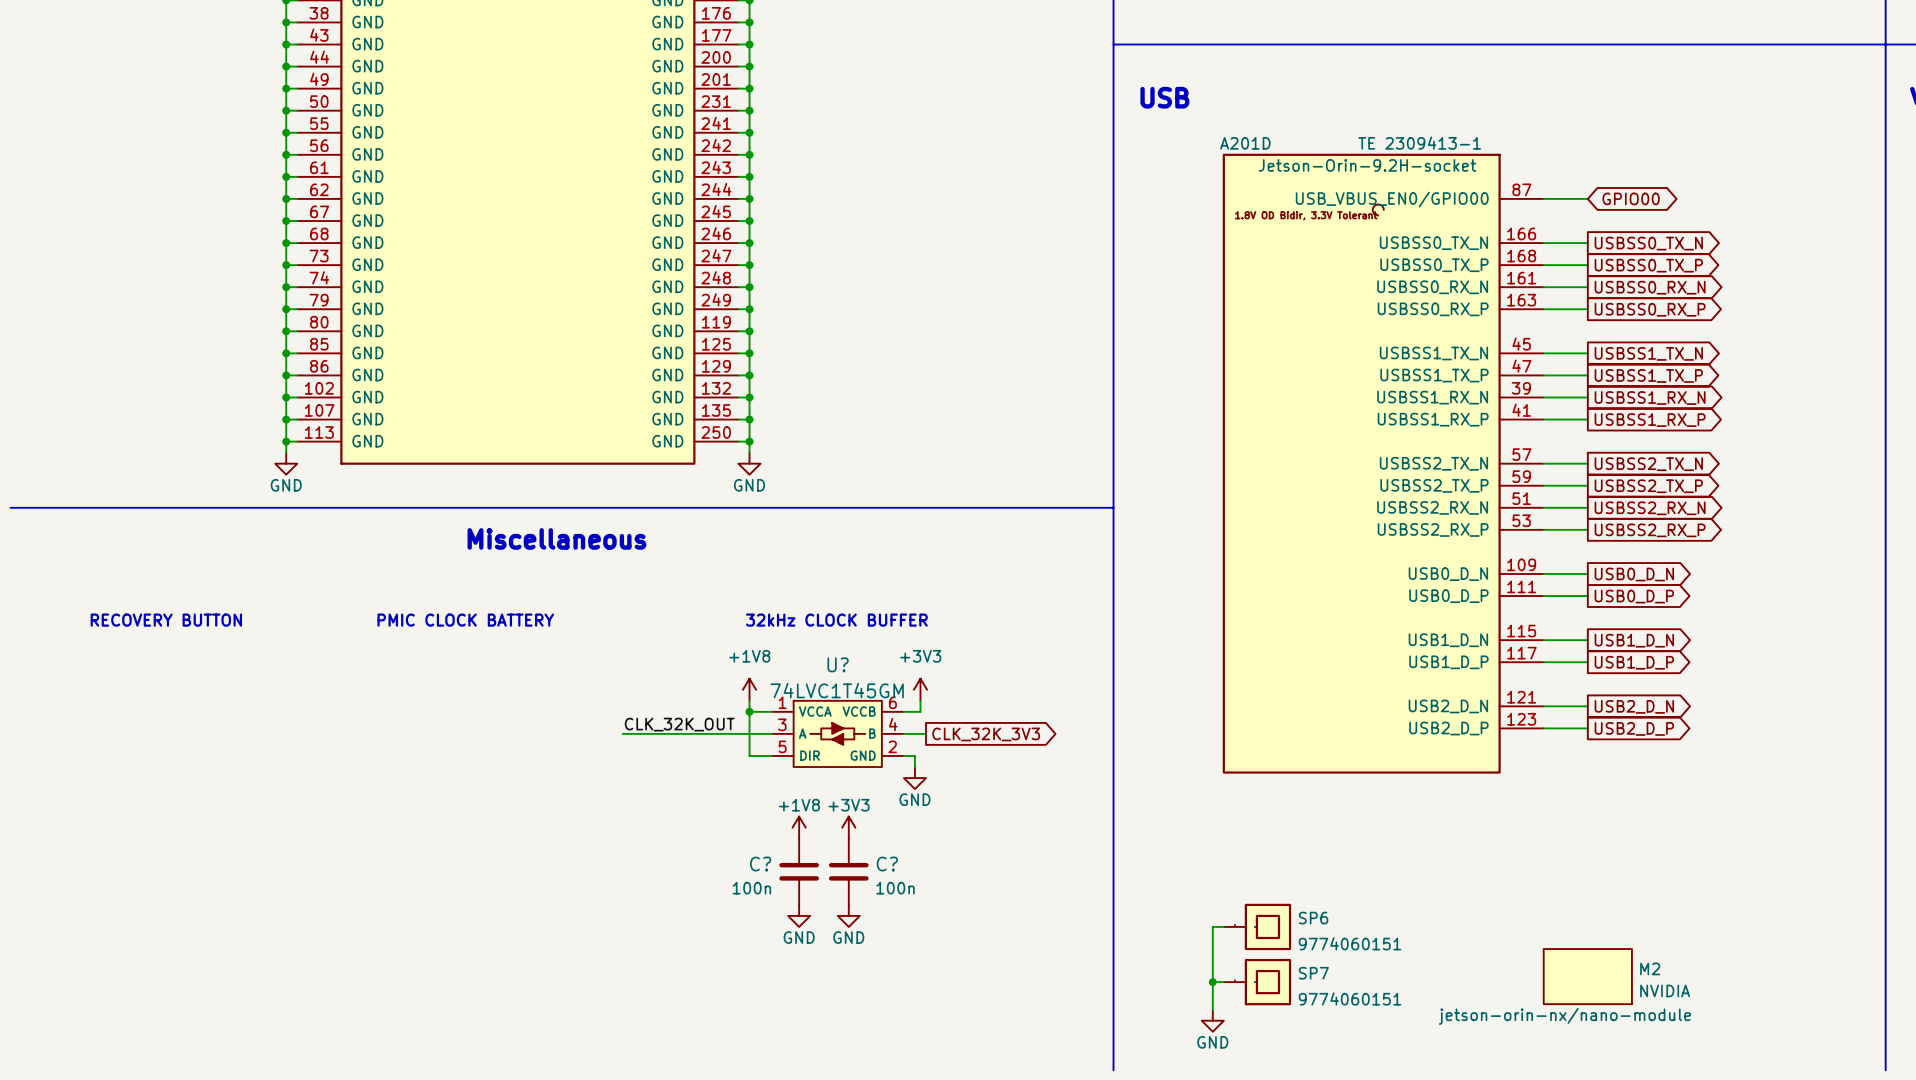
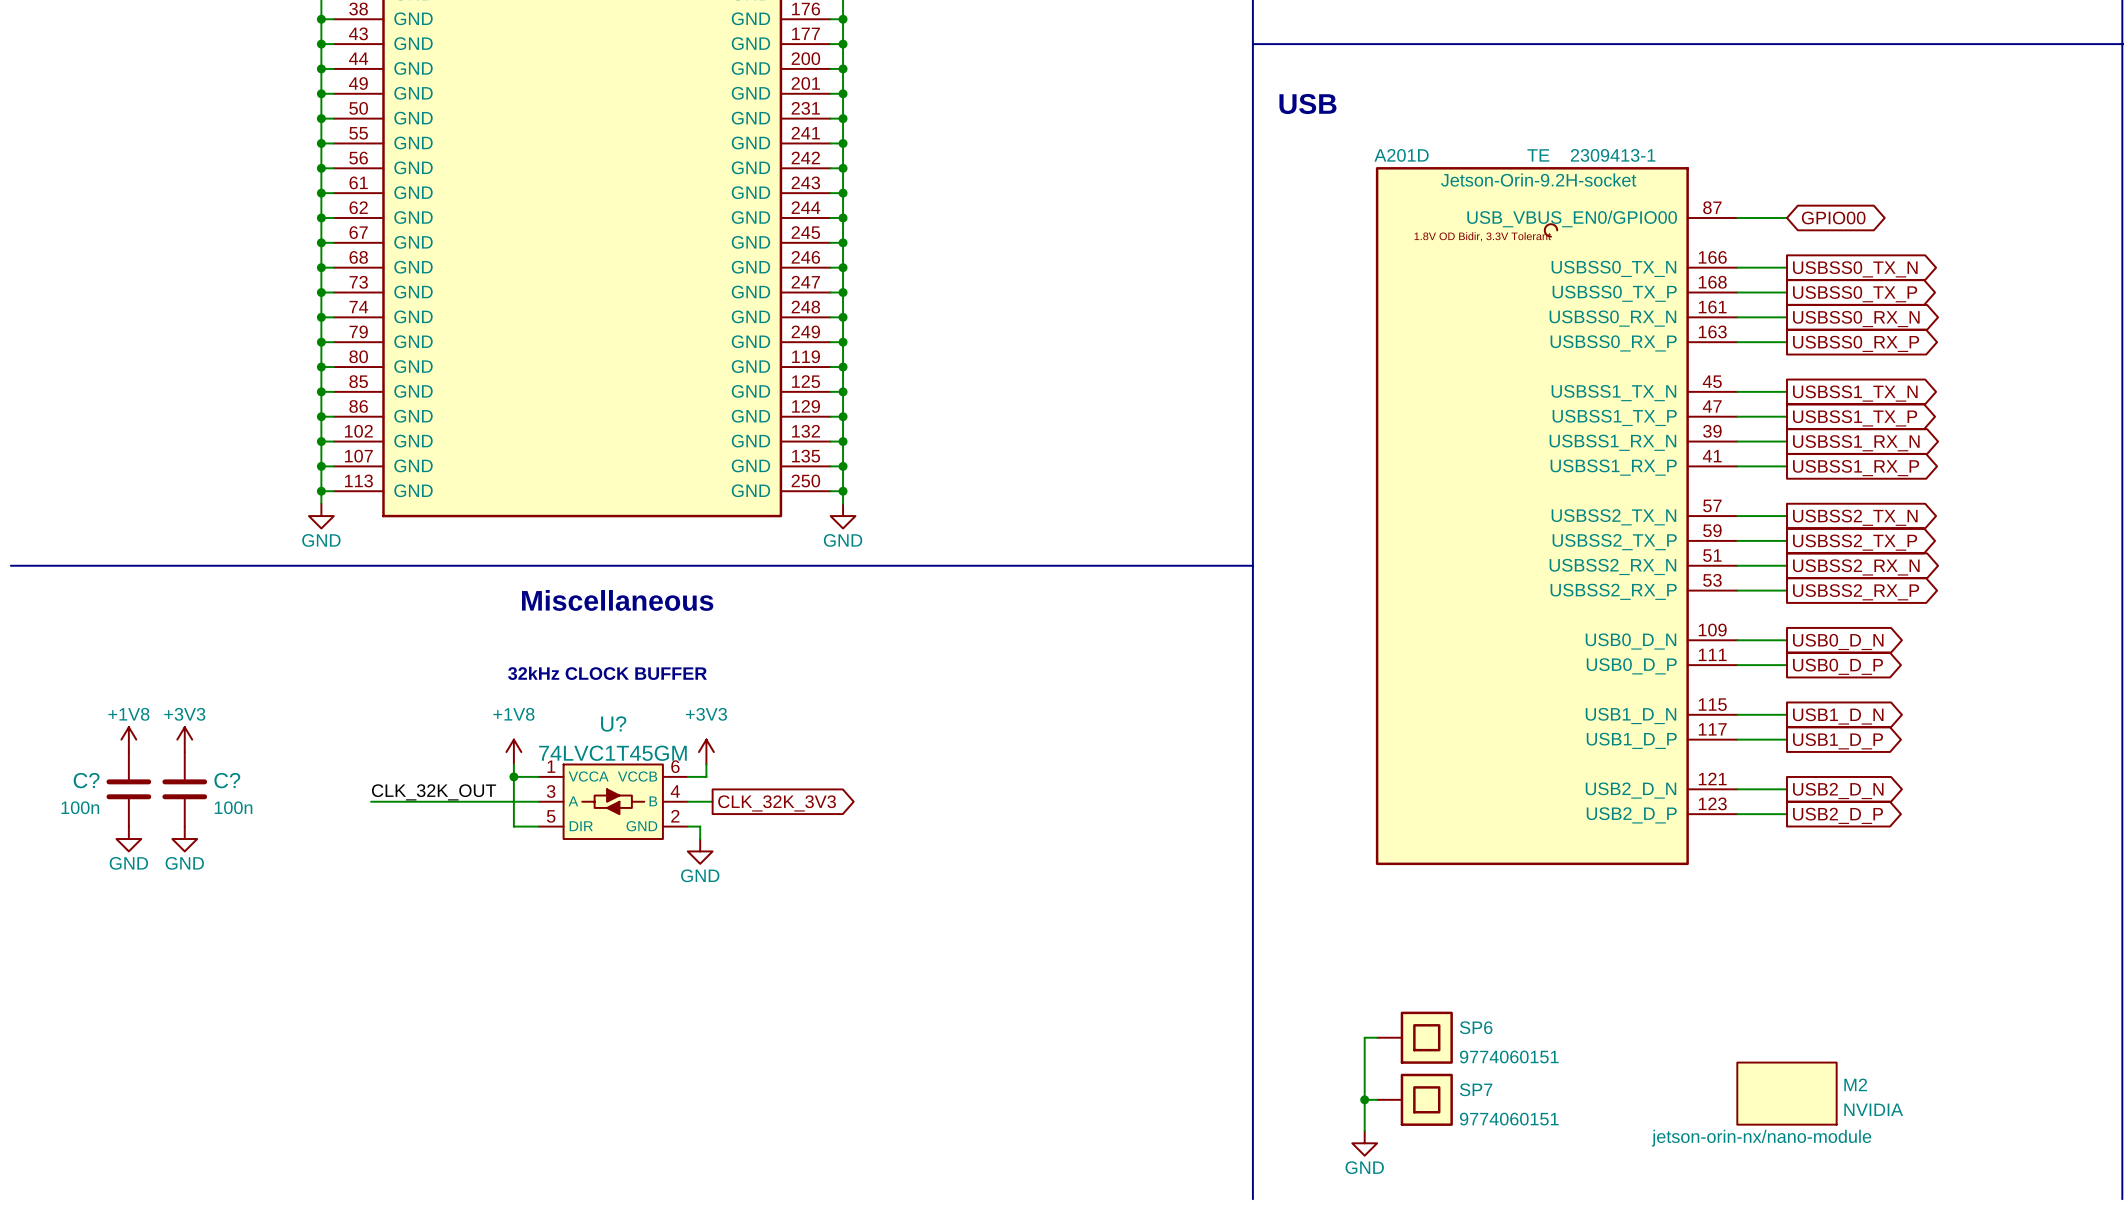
text: none -> 32kHz CLOCK BUFFER (607, 673)
text: RECOVERY BUTTON (166, 620) -> none
text: PMIC CLOCK BATTERY (465, 620) -> none
text: 32kHz CLOCK BUFFER (836, 620) -> none
power symbol: none -> +1V8 (128, 739)
power symbol: none -> +3V3 (184, 739)
power symbol: none -> +1V8 (513, 752)
power symbol: none -> +3V3 (706, 752)
wire: none -> (513, 764) (513, 826) (538, 826)
wire: none -> (706, 764) (706, 776) (687, 776)
power symbol: +1V8 (749, 689) -> none
power symbol: +3V3 (920, 689) -> none
wire: none -> (513, 776) (538, 776)
junction: none -> (513, 776)
wire: (749, 700) (749, 755) (771, 755) -> none
wire: (920, 700) (920, 711) (903, 711) -> none
C?: none -> (128, 789)
C?: none -> (184, 789)
label: none -> CLK_32K_OUT (434, 792)
wire: (749, 711) (771, 711) -> (687, 801) (712, 801)
junction: (749, 711) -> none
wire: none -> (371, 801) (538, 801)
U?: none -> 74LVC1T45GM (613, 801)
global label: none -> CLK_32K_3V3 (777, 803)
label: CLK_32K_OUT (679, 724) -> none
wire: (622, 733) (771, 733) -> none
U?: 74LVC1T45GM (837, 733) -> none
wire: (903, 733) (926, 733) -> none
global label: CLK_32K_3V3 (986, 734) -> none
wire: none -> (687, 826) (700, 826) (700, 839)
power symbol: none -> GND (128, 839)
power symbol: none -> GND (184, 839)
wire: (903, 755) (914, 755) (914, 767) -> none
power symbol: none -> GND (700, 851)
power symbol: GND (914, 778) -> none
power symbol: +1V8 (799, 827) -> none
power symbol: +3V3 (848, 827) -> none
C?: (799, 871) -> none
C?: (848, 871) -> none
power symbol: GND (799, 915) -> none
power symbol: GND (848, 915) -> none

